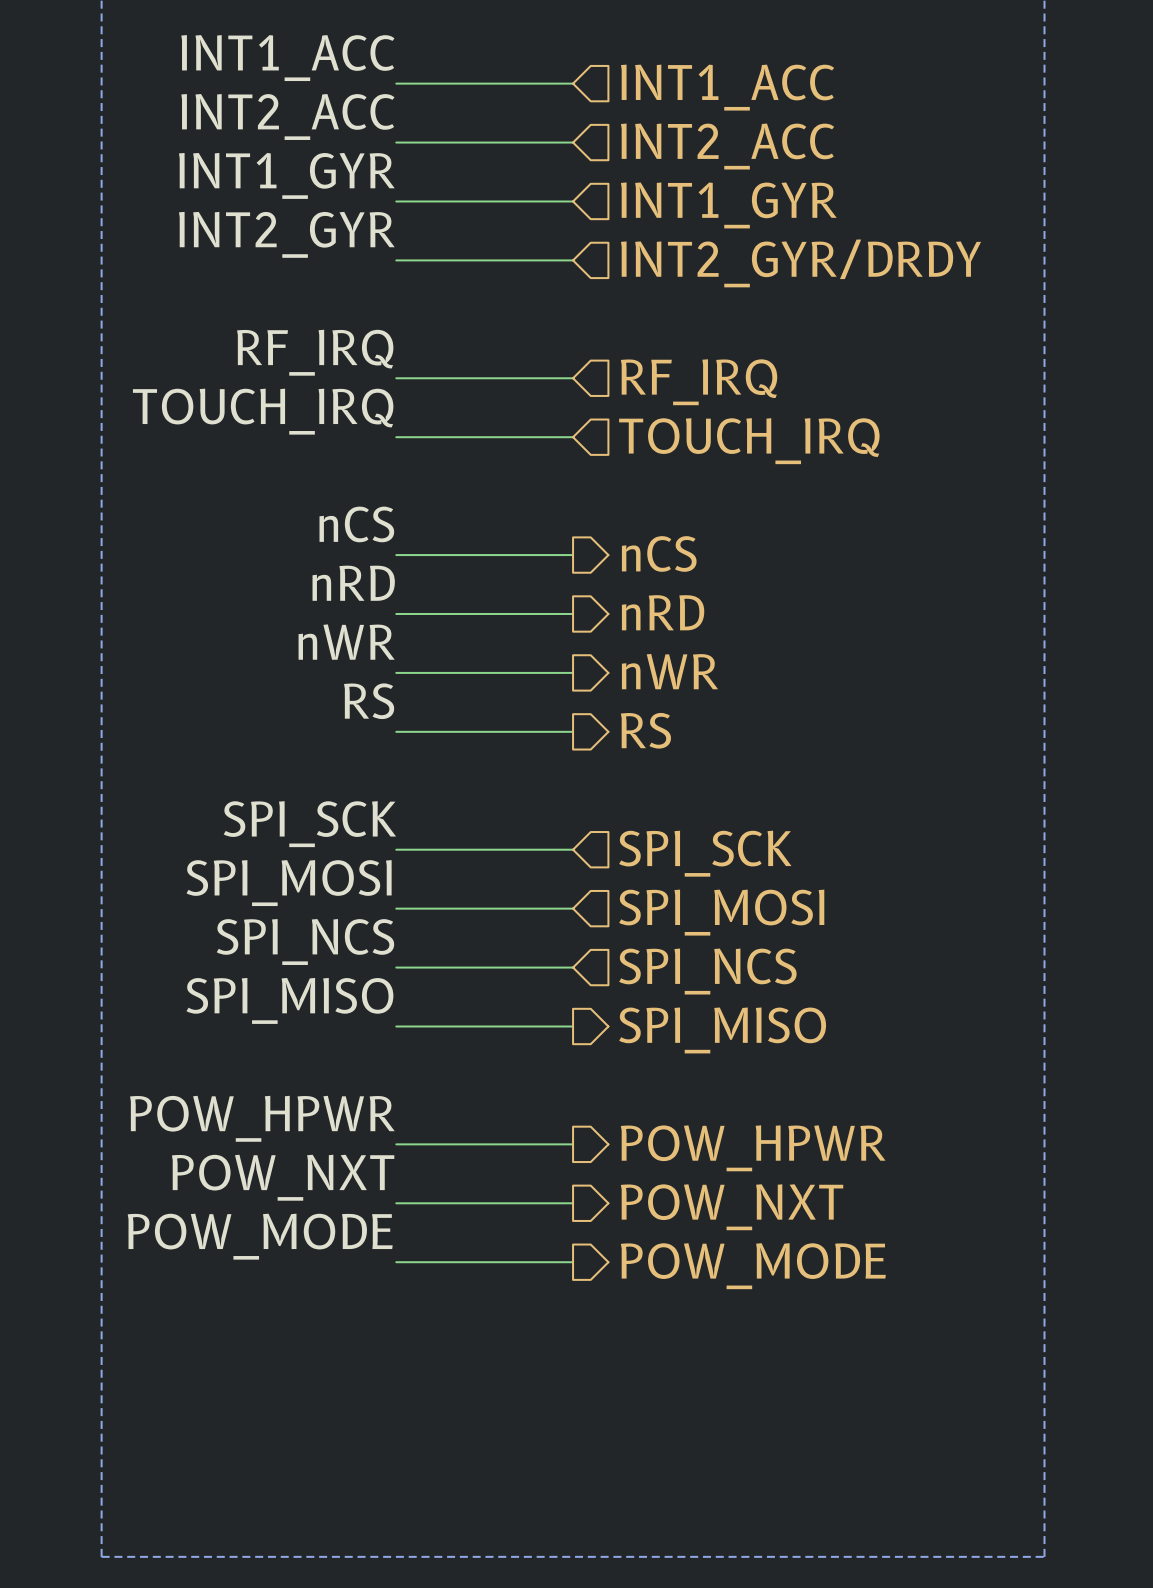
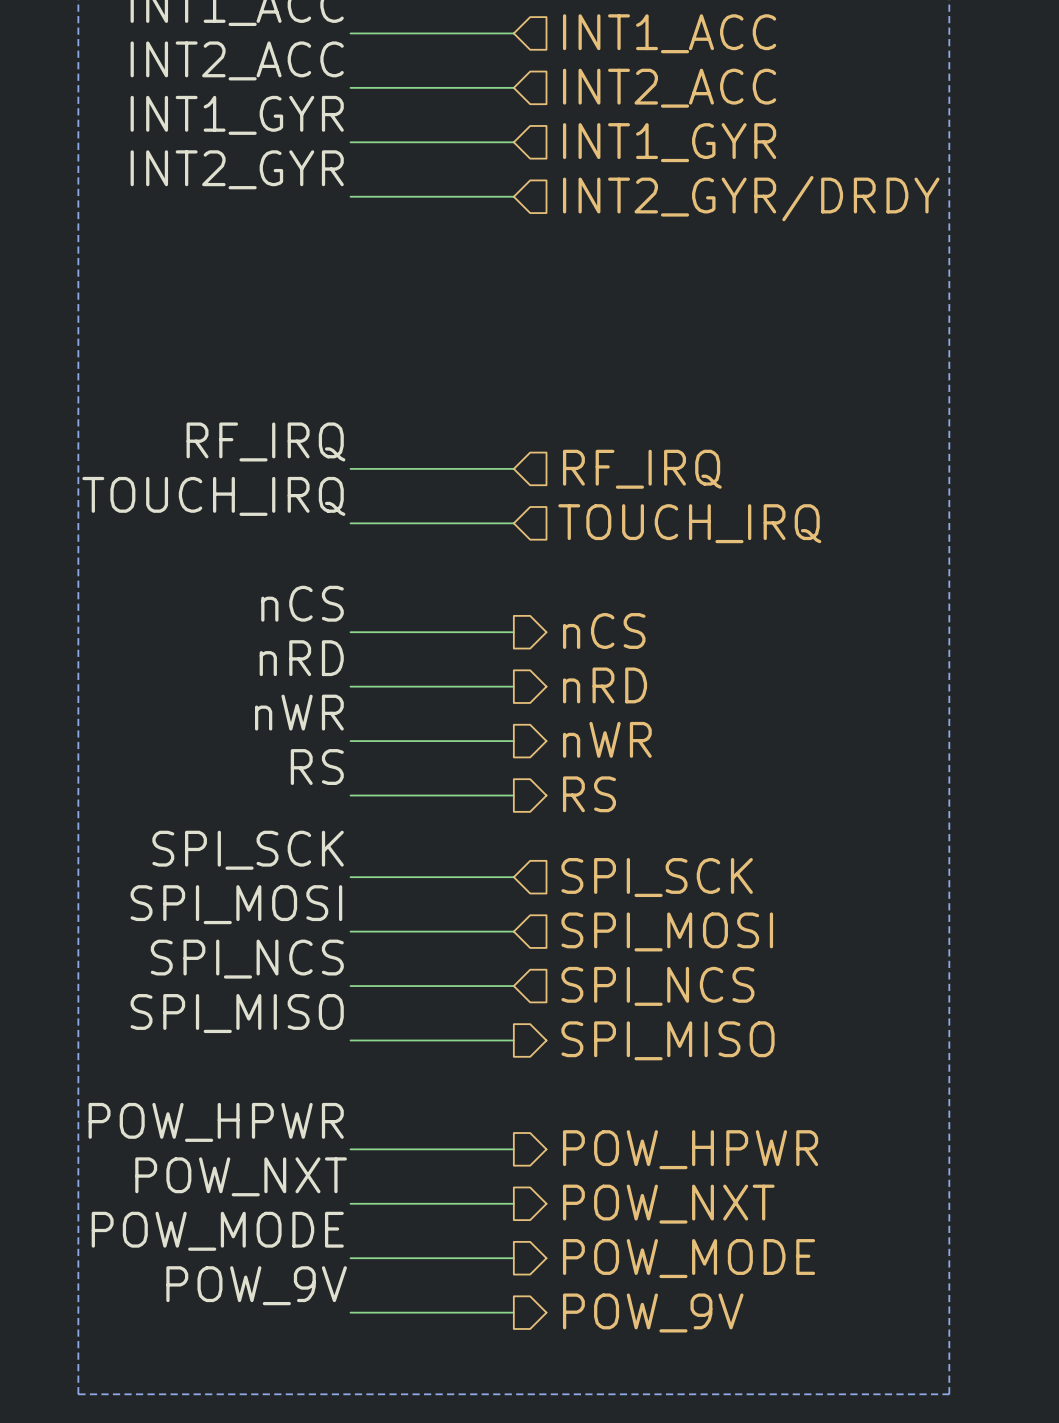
label: RF_IRQ (315, 352) -> none
wire: (396, 378) (573, 378) -> none
hierarchical label: RF_IRQ (699, 382) -> none
label: TOUCH_IRQ (263, 411) -> none
wire: (396, 437) (573, 437) -> (350, 686) (513, 686)
hierarchical label: TOUCH_IRQ (749, 441) -> none
label: nCS (356, 524) -> RF_IRQ (265, 441)
hierarchical label shape: output (659, 553) -> input (642, 469)
hierarchical label: nCS (659, 553) -> RF_IRQ (642, 469)
label: nRD (353, 583) -> TOUCH_IRQ (213, 496)
hierarchical label shape: output (663, 612) -> input (689, 523)
hierarchical label: nRD (663, 612) -> TOUCH_IRQ (689, 523)
label: nWR (346, 642) -> none
hierarchical label: nWR (669, 671) -> none
wire: (396, 672) (573, 672) -> (350, 877) (513, 877)
label: RS (369, 701) -> nCS (302, 603)
hierarchical label: RS (645, 730) -> nCS (604, 630)
label: none -> nRD (301, 658)
hierarchical label: none -> nRD (605, 685)
label: SPI_SCK (309, 824) -> nWR (299, 712)
hierarchical label shape: input (705, 853) -> output (607, 739)
hierarchical label: SPI_SCK (705, 853) -> nWR (607, 739)
label: SPI_MOSI (289, 883) -> RS (317, 767)
hierarchical label shape: input (721, 912) -> output (589, 794)
hierarchical label: SPI_MOSI (721, 912) -> RS (589, 794)
label position: SPI_NCS (305, 942) -> SPI_NCS (247, 959)
wire: (396, 967) (573, 967) -> (350, 986) (513, 986)
label: none -> SPI_SCK (248, 850)
hierarchical label position: SPI_NCS (707, 971) -> SPI_NCS (657, 986)
label position: SPI_MISO (289, 1000) -> SPI_MISO (237, 1013)
hierarchical label: none -> SPI_SCK (657, 877)
wire: (396, 1026) (573, 1026) -> (350, 1040) (513, 1040)
label: none -> SPI_MOSI (236, 904)
hierarchical label position: SPI_MISO (722, 1030) -> SPI_MISO (668, 1040)
wire: none -> (350, 931) (513, 931)
hierarchical label: none -> SPI_MOSI (667, 931)
label position: POW_HPWR (262, 1118) -> POW_HPWR (216, 1122)
wire: (396, 1144) (573, 1144) -> (350, 1149) (513, 1149)
hierarchical label position: POW_HPWR (753, 1148) -> POW_HPWR (690, 1149)
label position: POW_NXT (283, 1177) -> POW_NXT (241, 1176)
wire: (396, 1203) (573, 1203) -> (350, 1203) (513, 1203)
hierarchical label position: POW_NXT (732, 1207) -> POW_NXT (668, 1204)
label position: POW_MODE (260, 1236) -> POW_MODE (217, 1231)
wire: (396, 1262) (573, 1262) -> (350, 1258) (513, 1258)
hierarchical label position: POW_MODE (753, 1266) -> POW_MODE (689, 1258)
label: none -> POW_9V (256, 1285)
wire: none -> (350, 1312) (513, 1312)
hierarchical label: none -> POW_9V (653, 1312)

